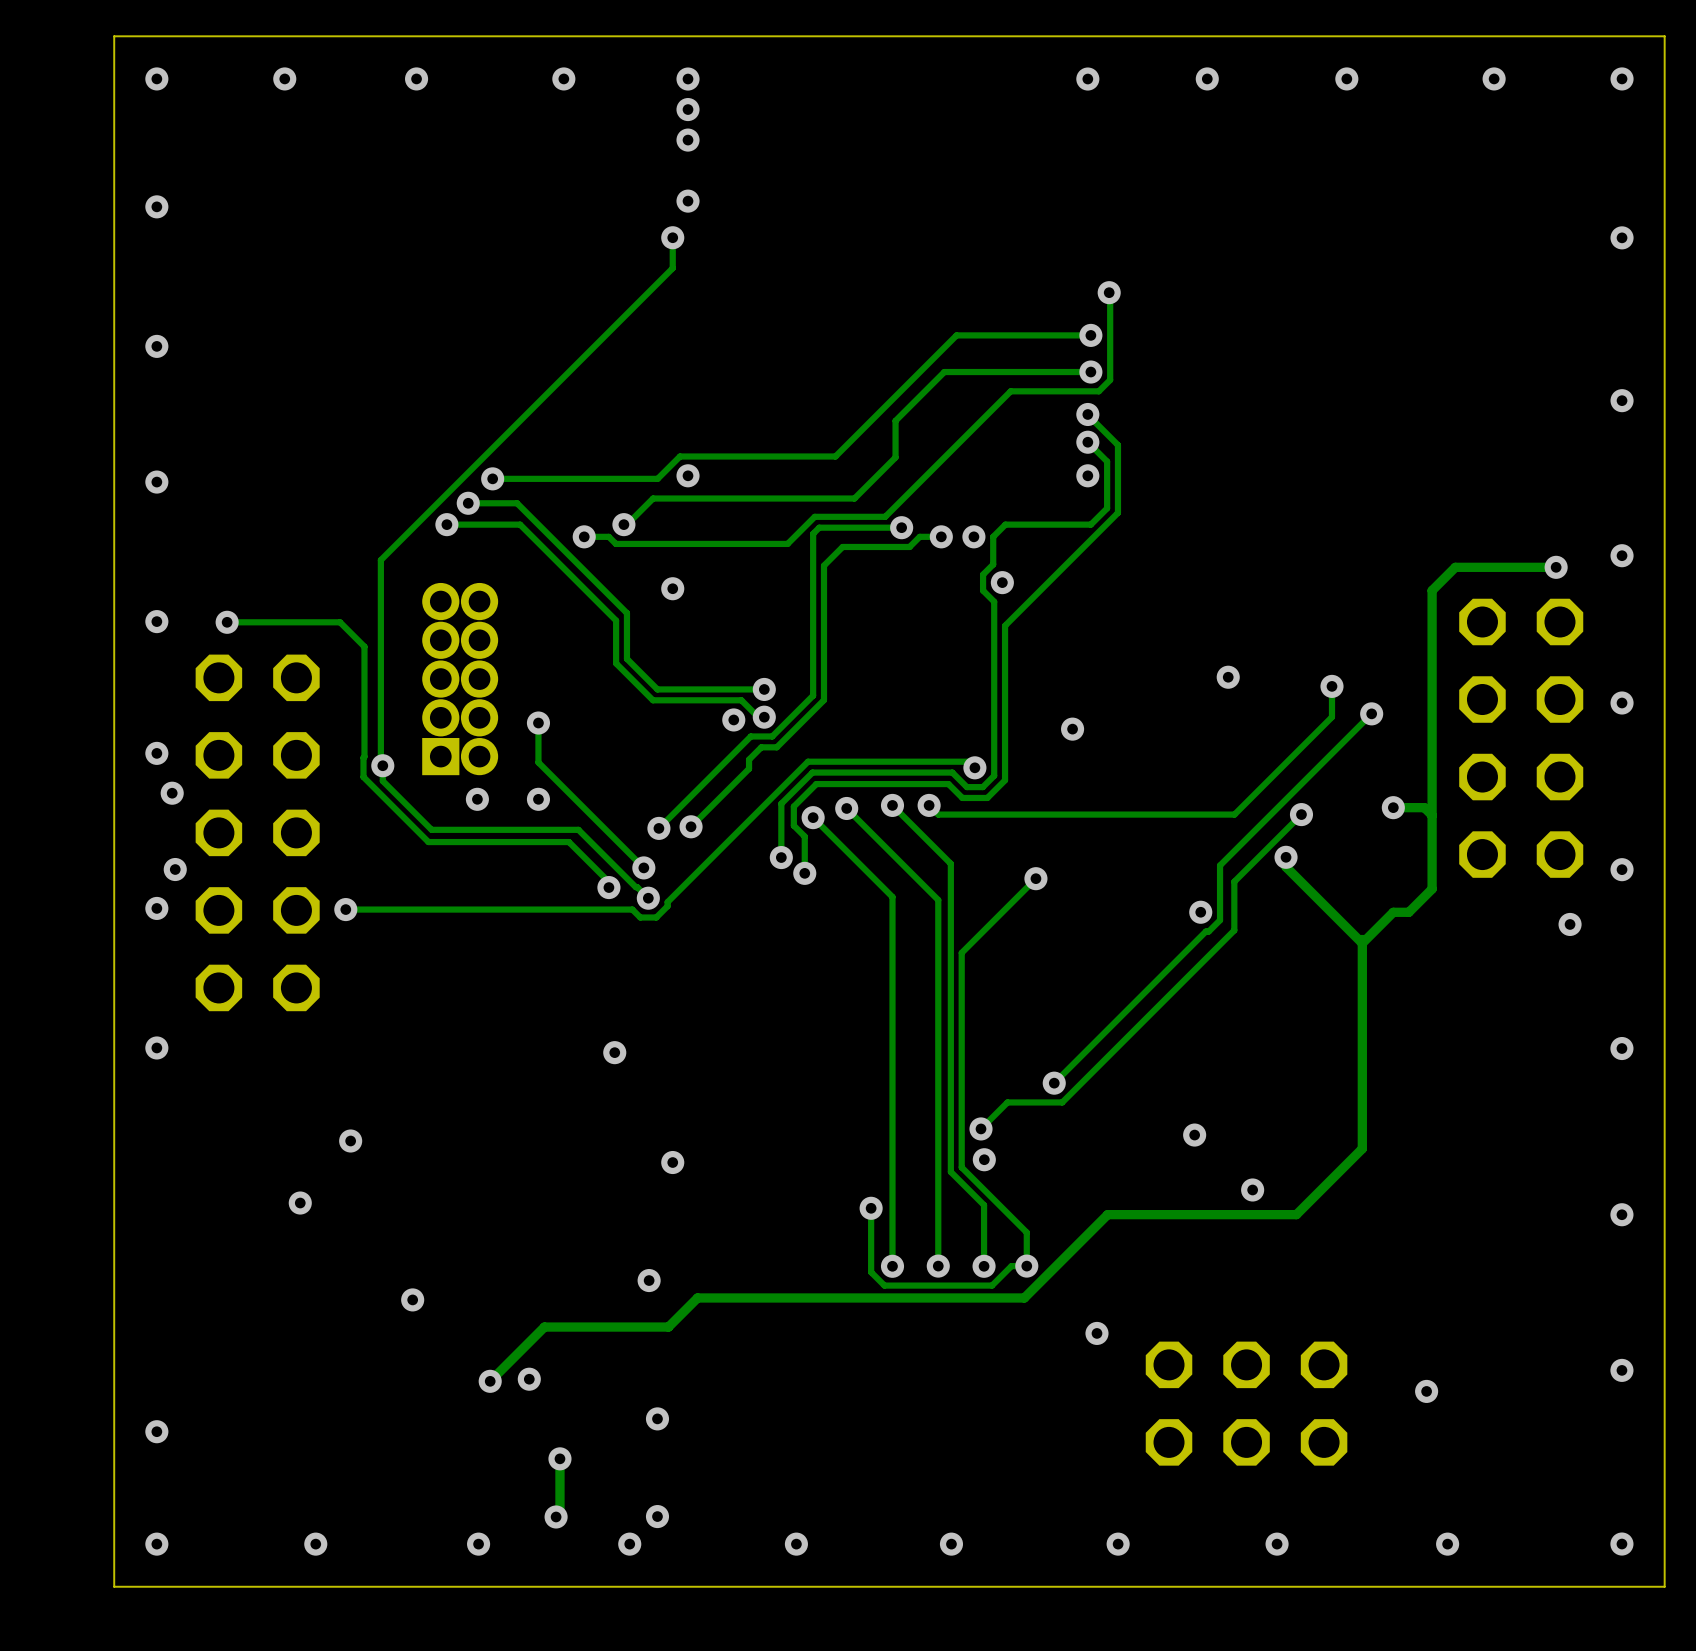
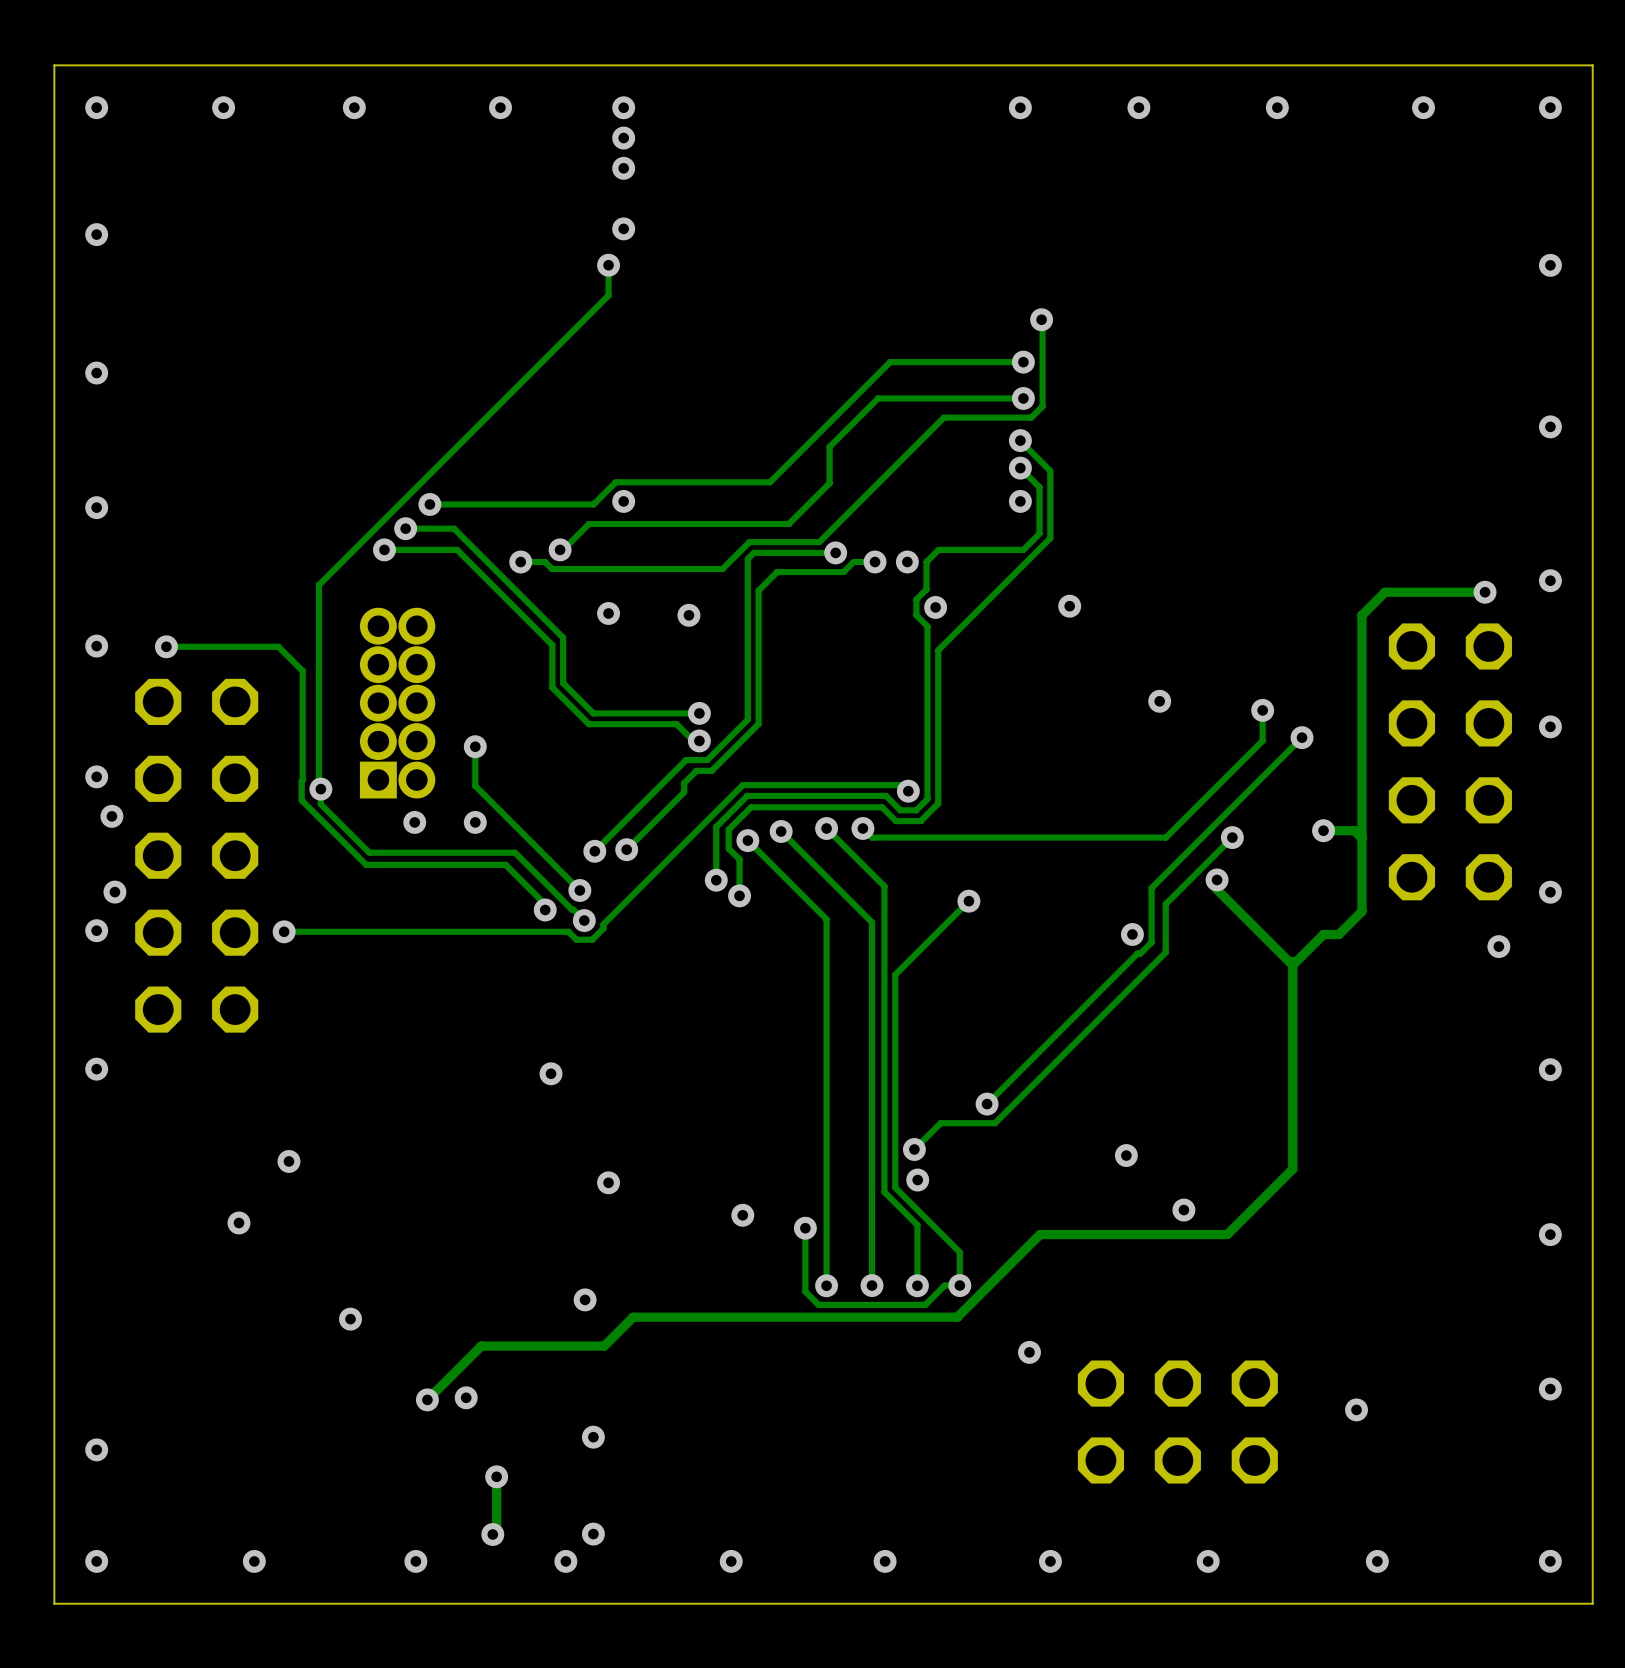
via position: (733, 719) -> (688, 615)
via position: (1072, 729) -> (1069, 606)
via: none -> (742, 1215)

